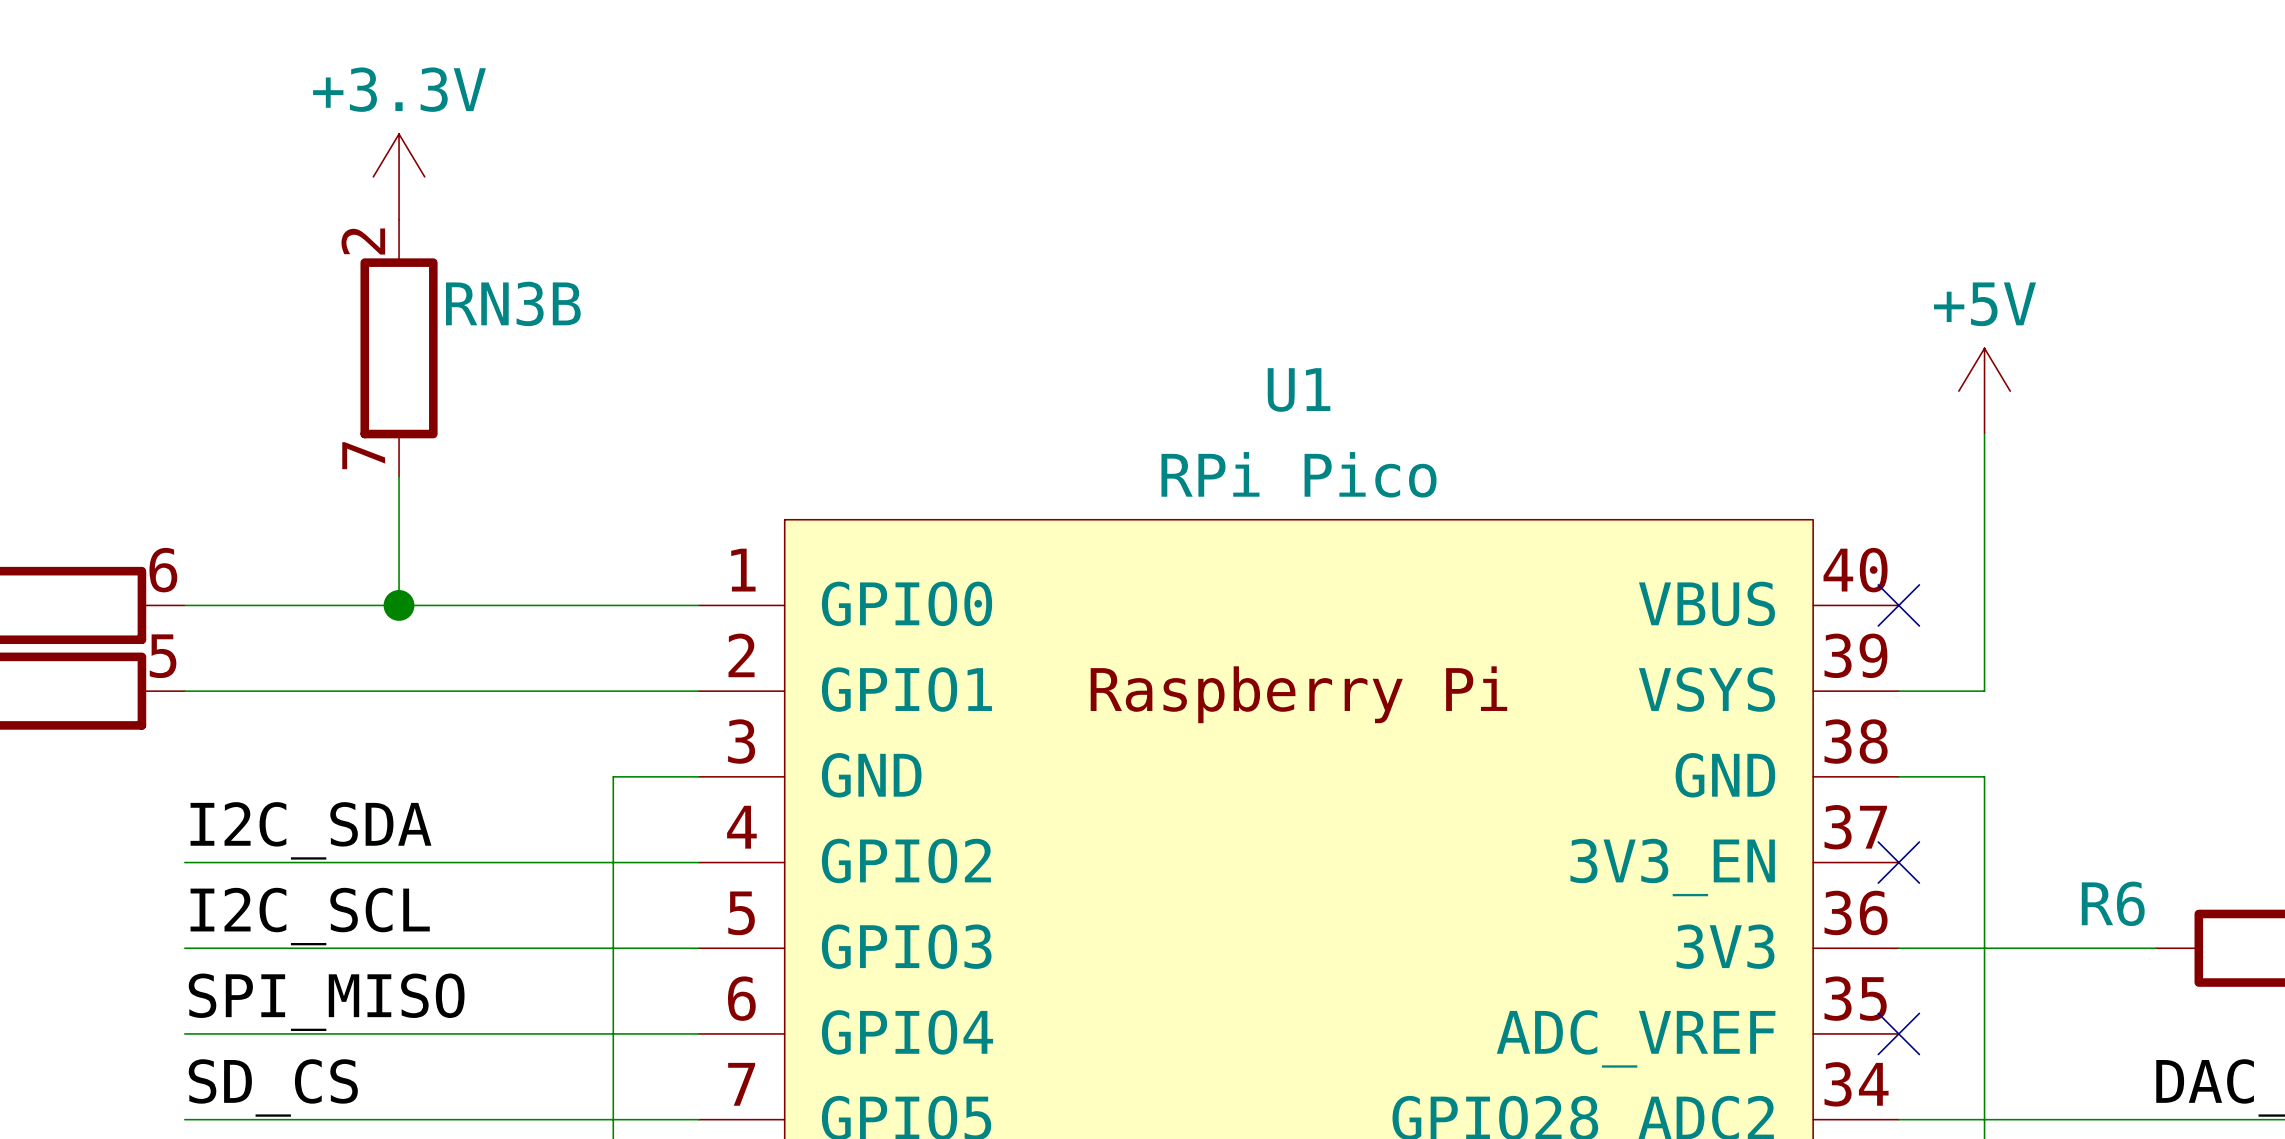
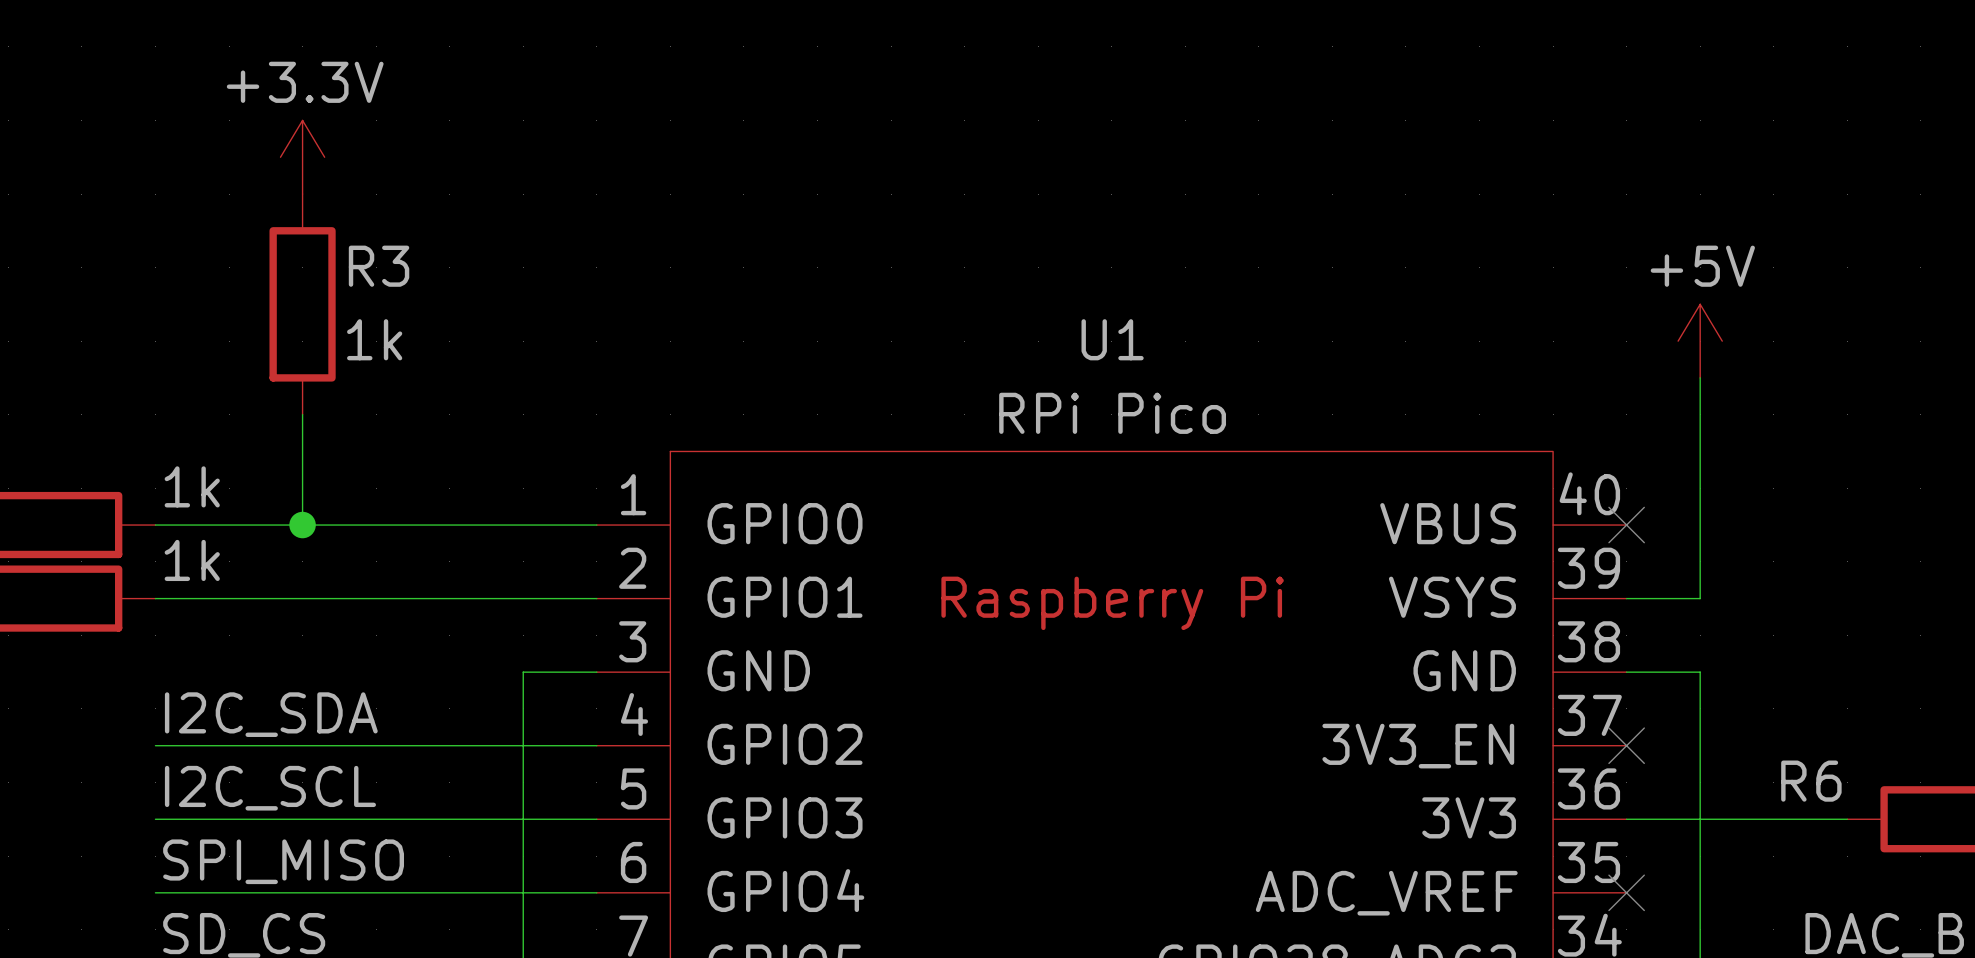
power symbol position: +3.3V (399, 176) -> +3.3V (302, 157)
R3: none -> 1k (302, 304)
RN3B: (399, 348) -> none
wire: (399, 476) (399, 605) -> (302, 414) (302, 525)
part value: none -> 1k (192, 486)
part pin number: 6 (163, 570) -> none
junction position: (399, 605) -> (302, 525)
part value: none -> 1k (192, 560)
part pin number: 5 (163, 656) -> none

